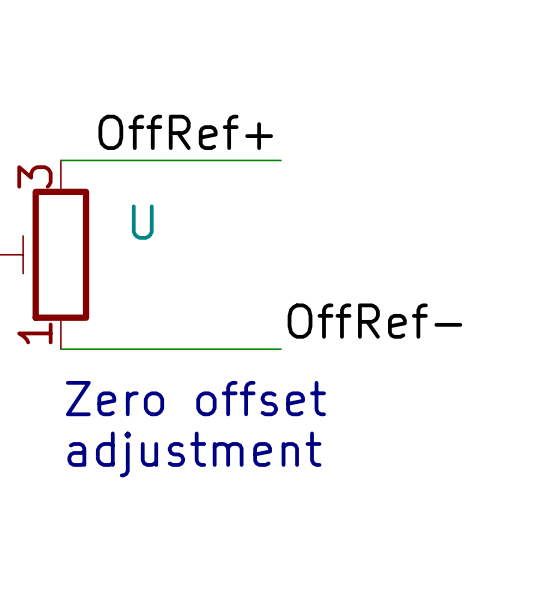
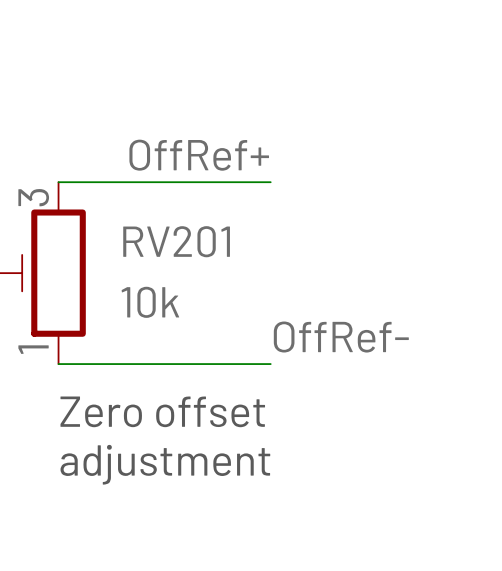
U name: U (142, 222) -> RV201 (176, 241)
U value: none -> 10k (150, 302)

